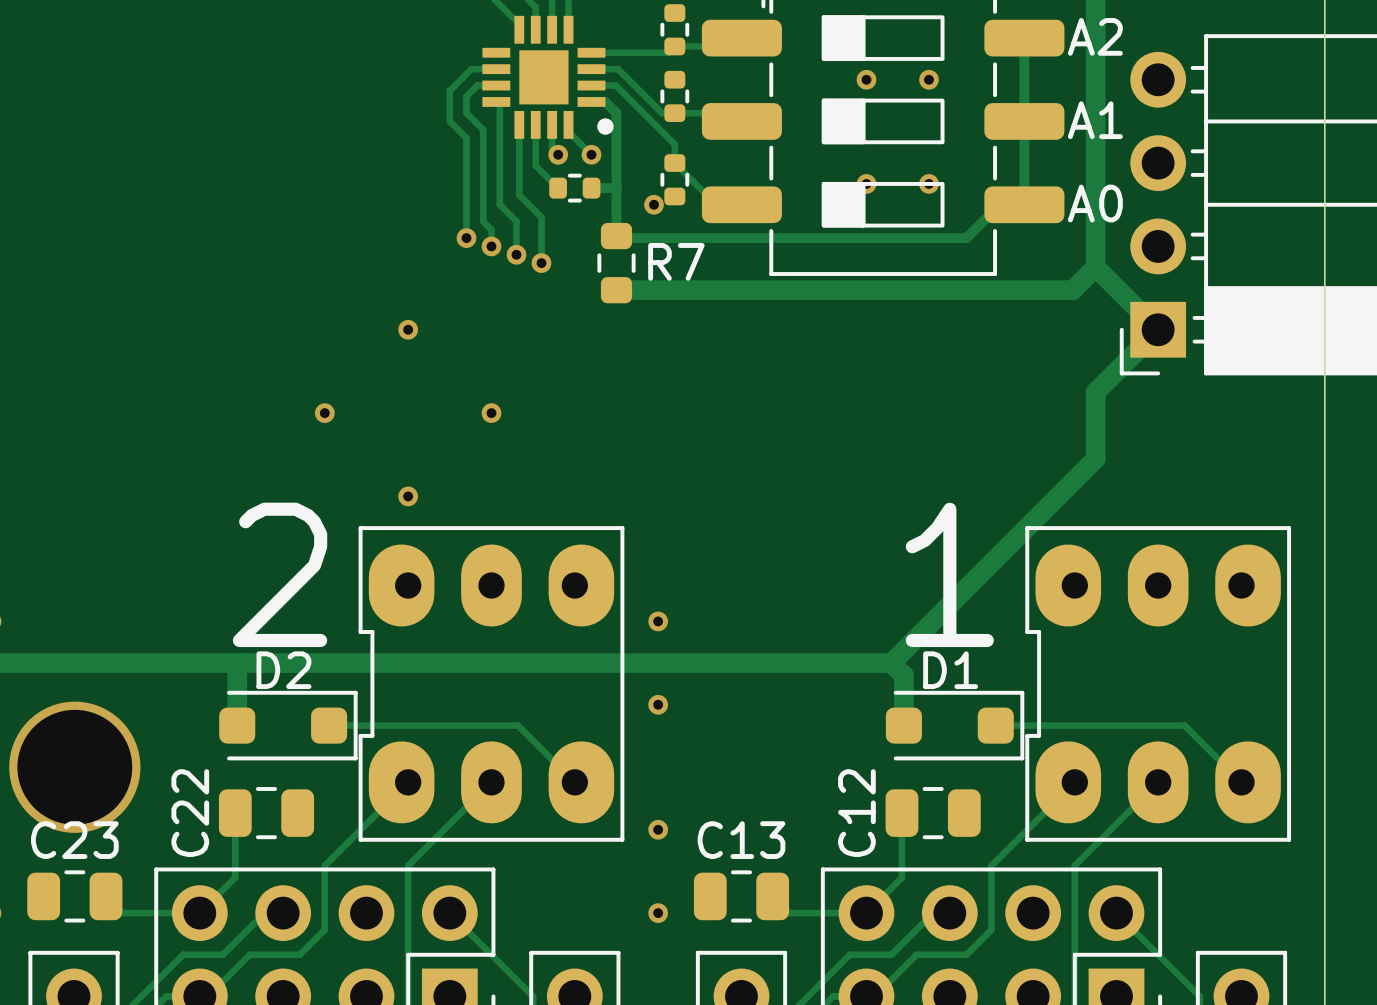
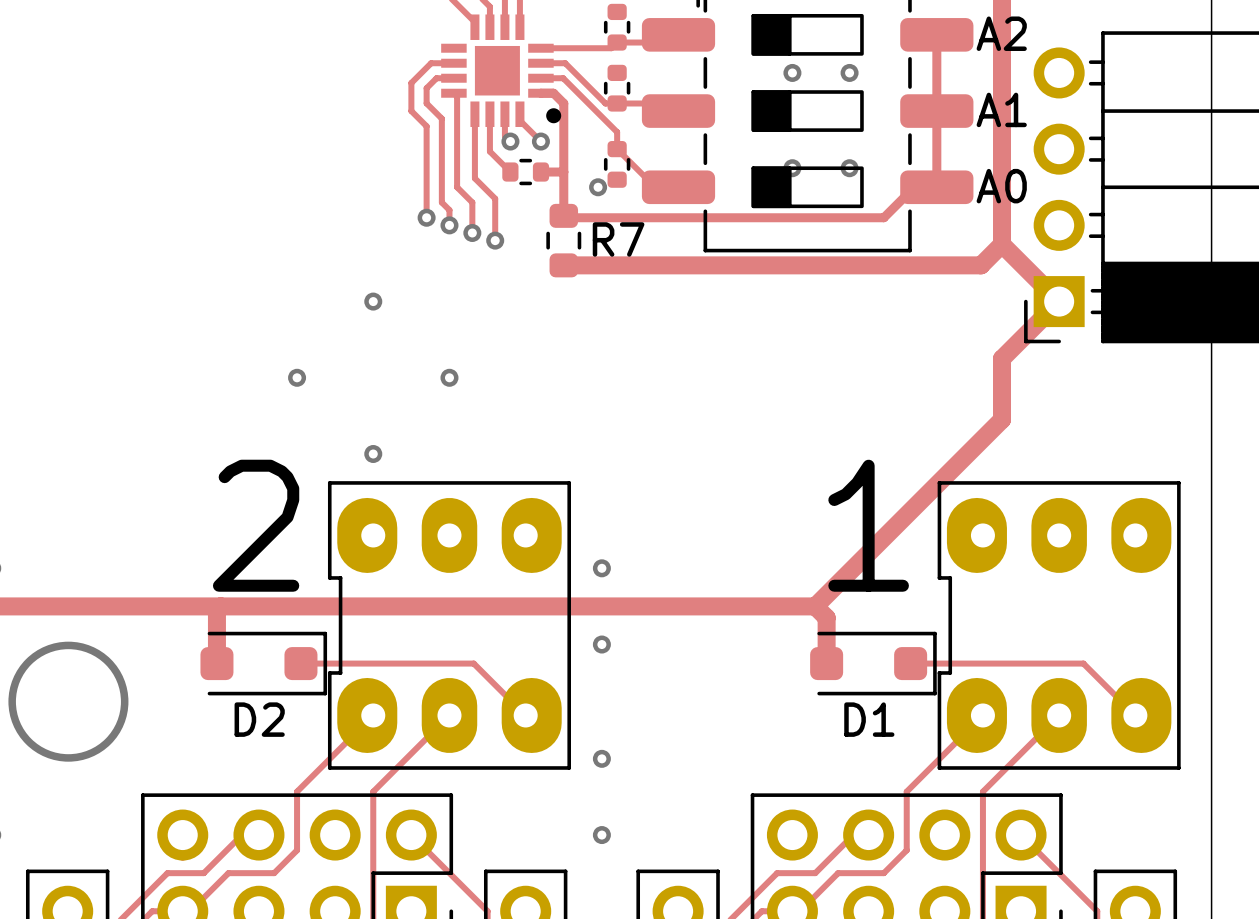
D2 name position: D2 (283, 670) -> D2 (259, 719)
D1 name position: D1 (950, 670) -> D1 (869, 719)
track: (235, 813) (235, 877) (199, 913) (122, 913) (106, 896) -> none
C22: (266, 813) -> none
track: (901, 813) (901, 877) (866, 913) (789, 913) (772, 896) -> none
C12: (933, 813) -> none
C23: (74, 896) -> none
C13: (741, 896) -> none

